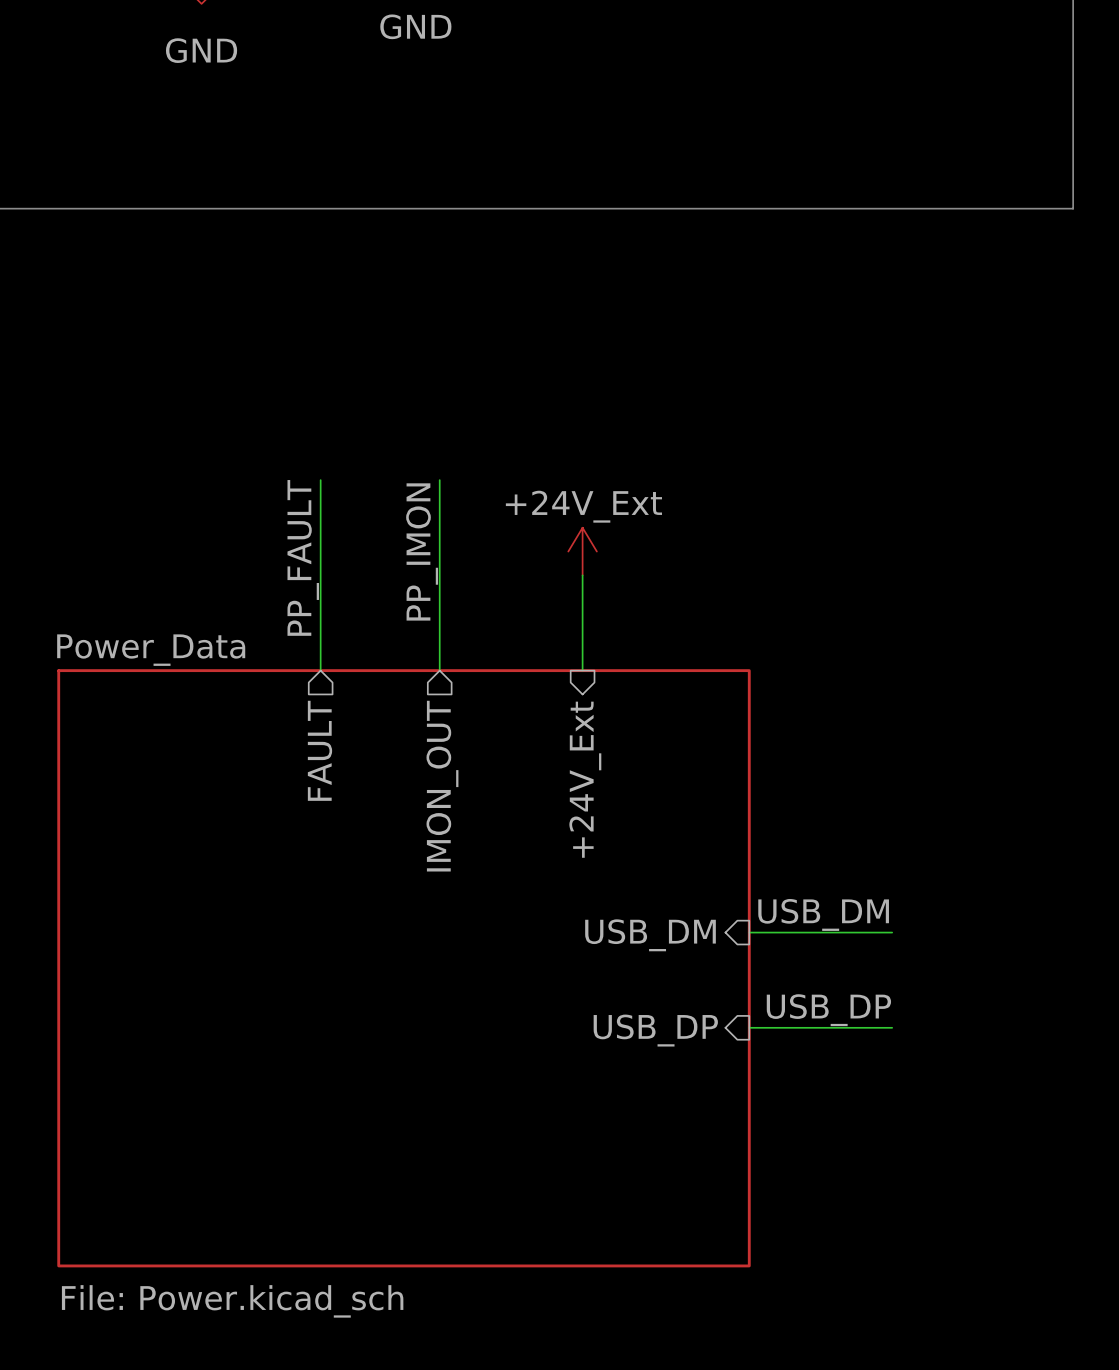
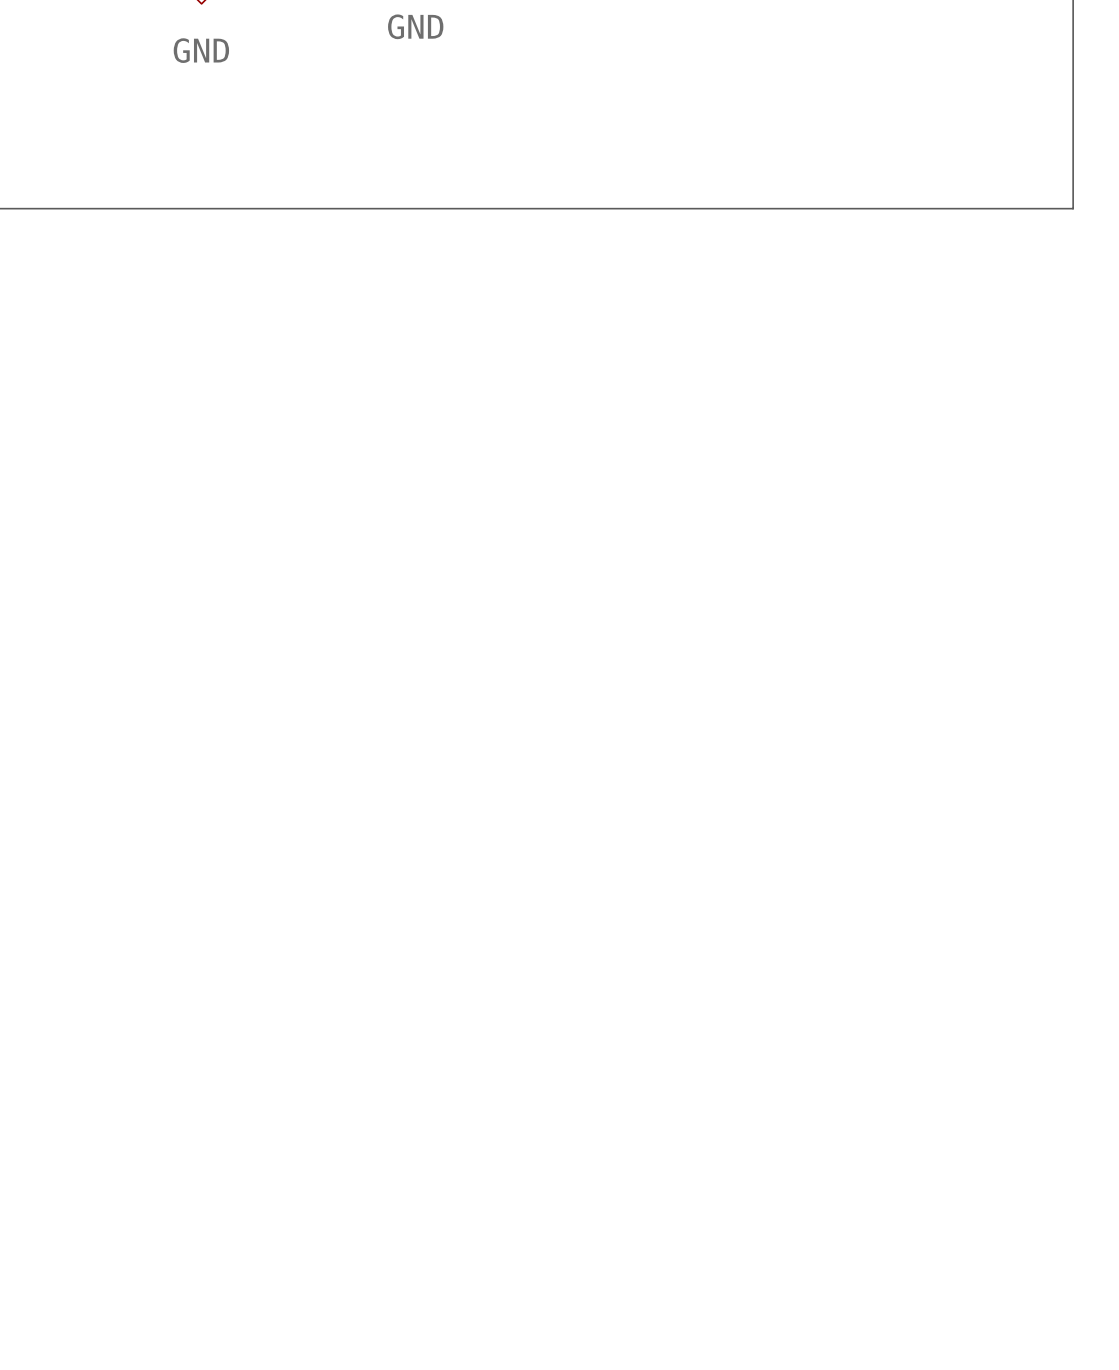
wire: (320, 480) (320, 670) -> none
wire: (439, 480) (439, 670) -> none
label: PP_IMON (422, 551) -> none
power symbol: +24V_Ext (582, 551) -> none
label: PP_FAULT (303, 557) -> none
wire: (582, 575) (582, 670) -> none
sheet pin: FAULT (319, 750) -> none
sheet pin: +24V_Ext (585, 779) -> none
sheet pin: IMON_OUT (442, 786) -> none
label: USB_DM (823, 914) -> none
wire: (749, 932) (892, 932) -> none
sheet pin: USB_DM (650, 935) -> none
sheet Power_Data: File: Power.kicad_sch (404, 968) -> none
label: USB_DP (828, 1010) -> none
wire: (749, 1027) (892, 1027) -> none
sheet pin: USB_DP (655, 1030) -> none

